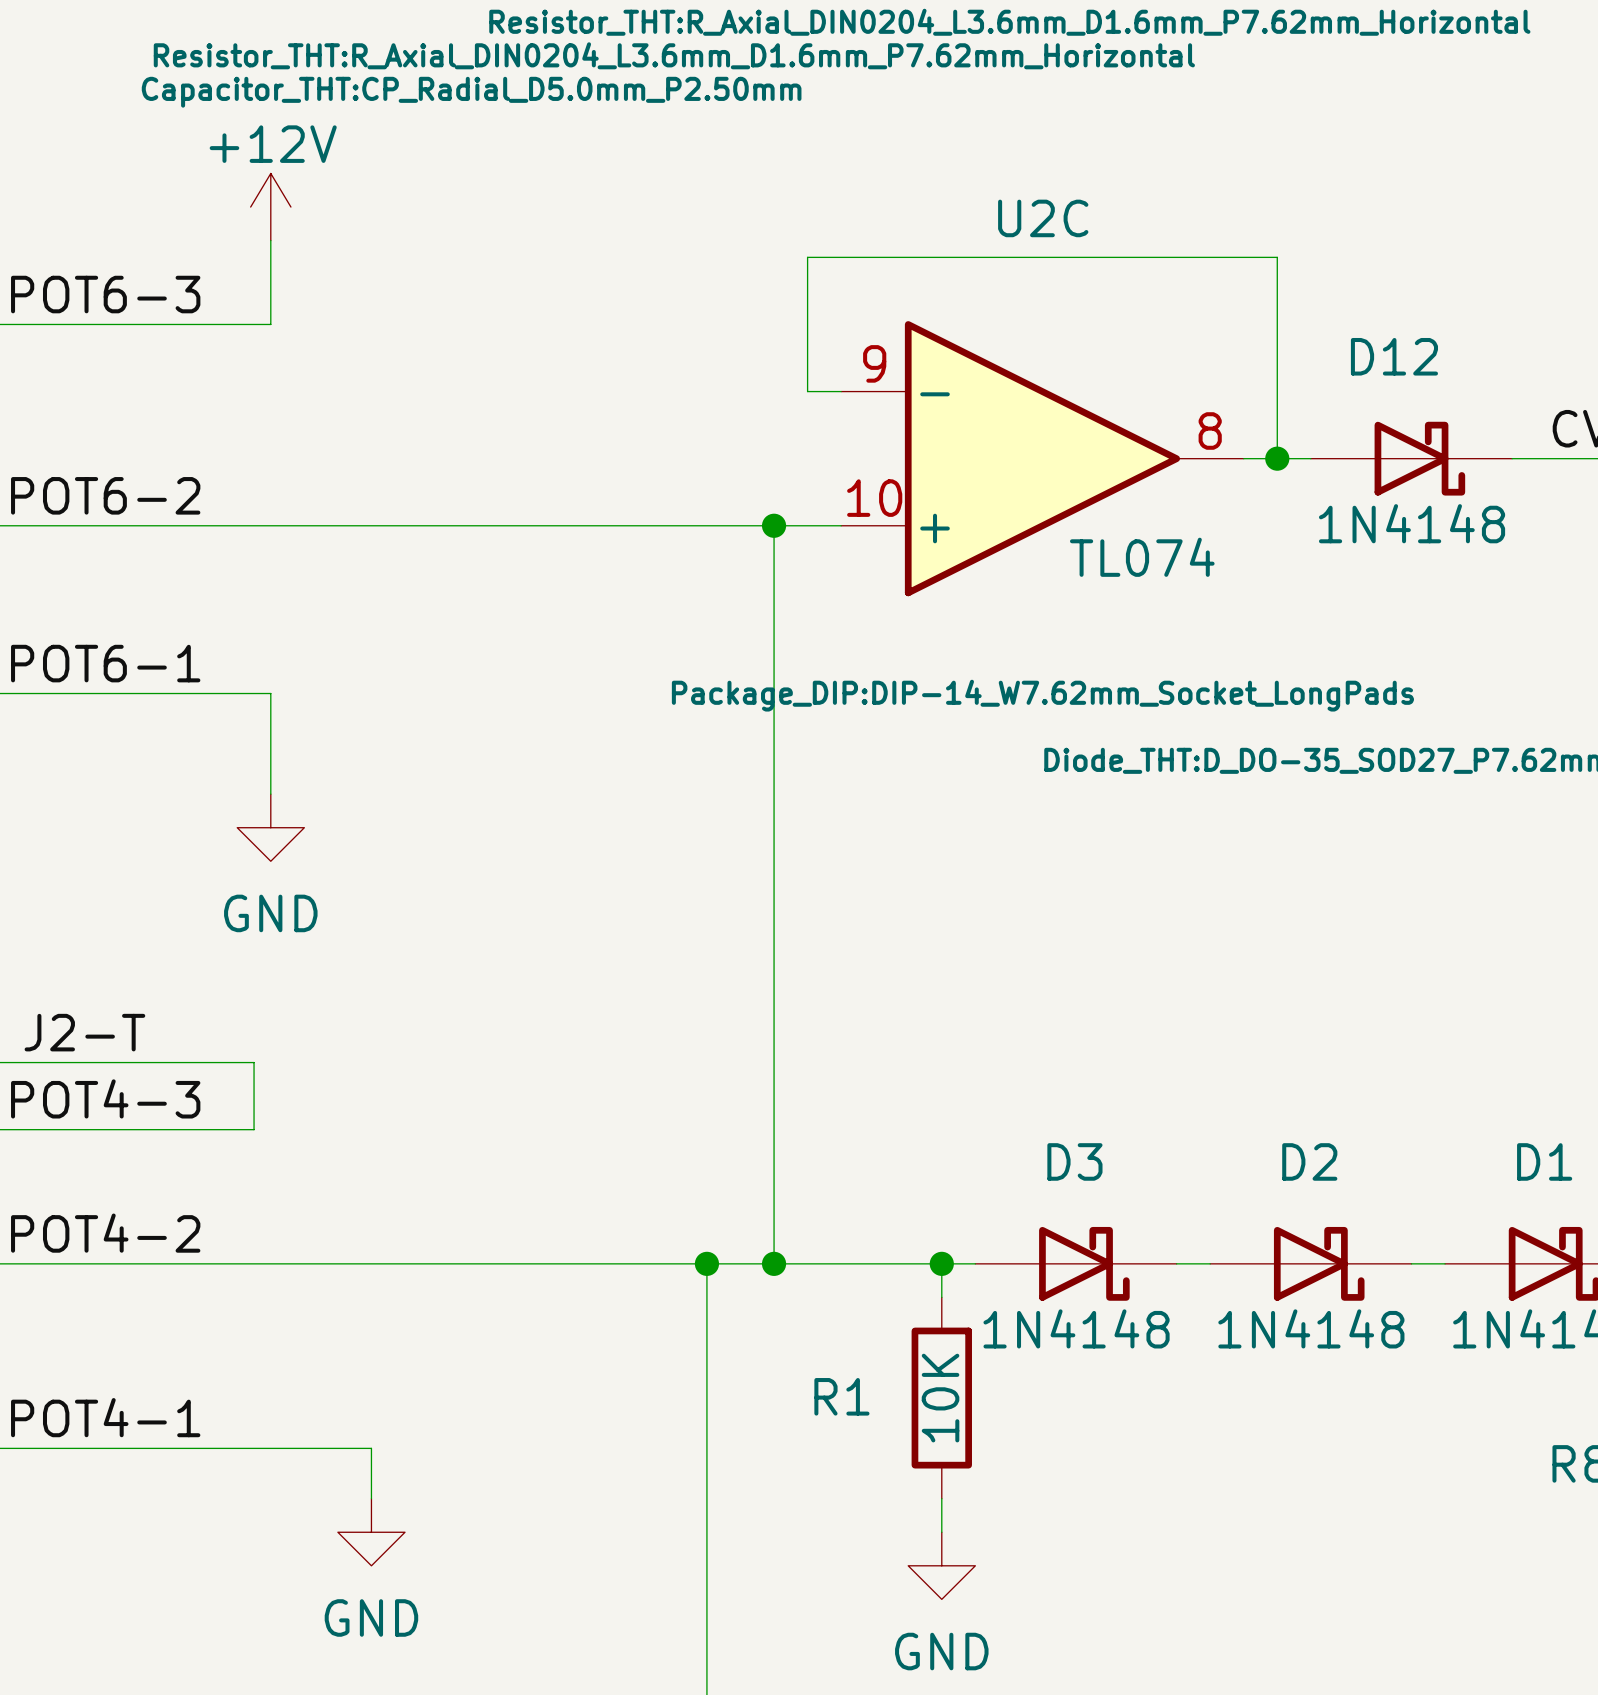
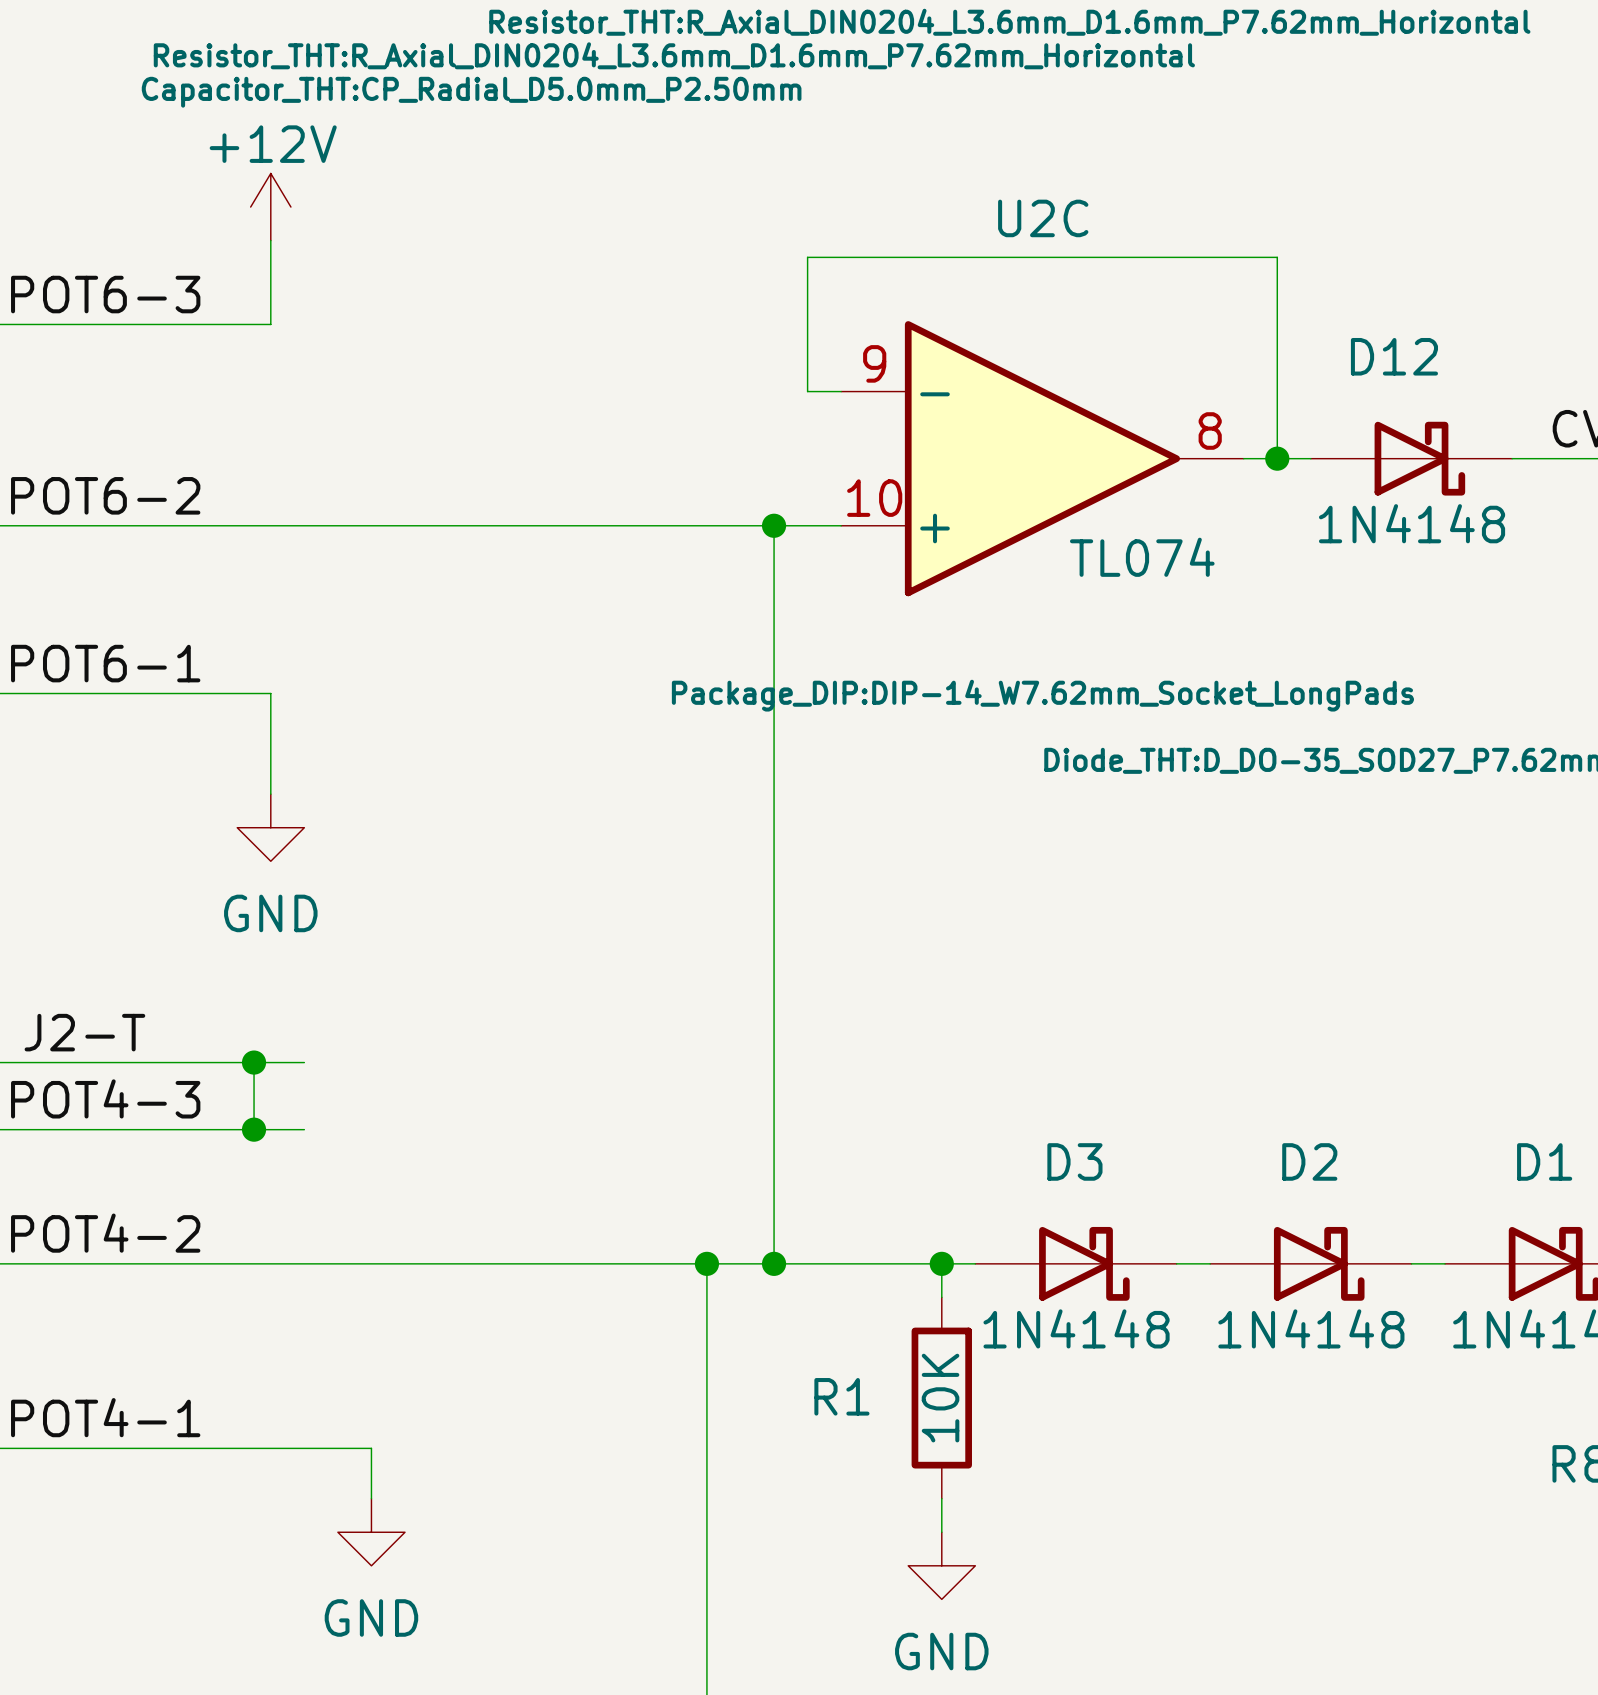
wire: none -> (254, 1062) (304, 1062)
junction: none -> (254, 1062)
wire: none -> (254, 1129) (304, 1129)
junction: none -> (254, 1129)

